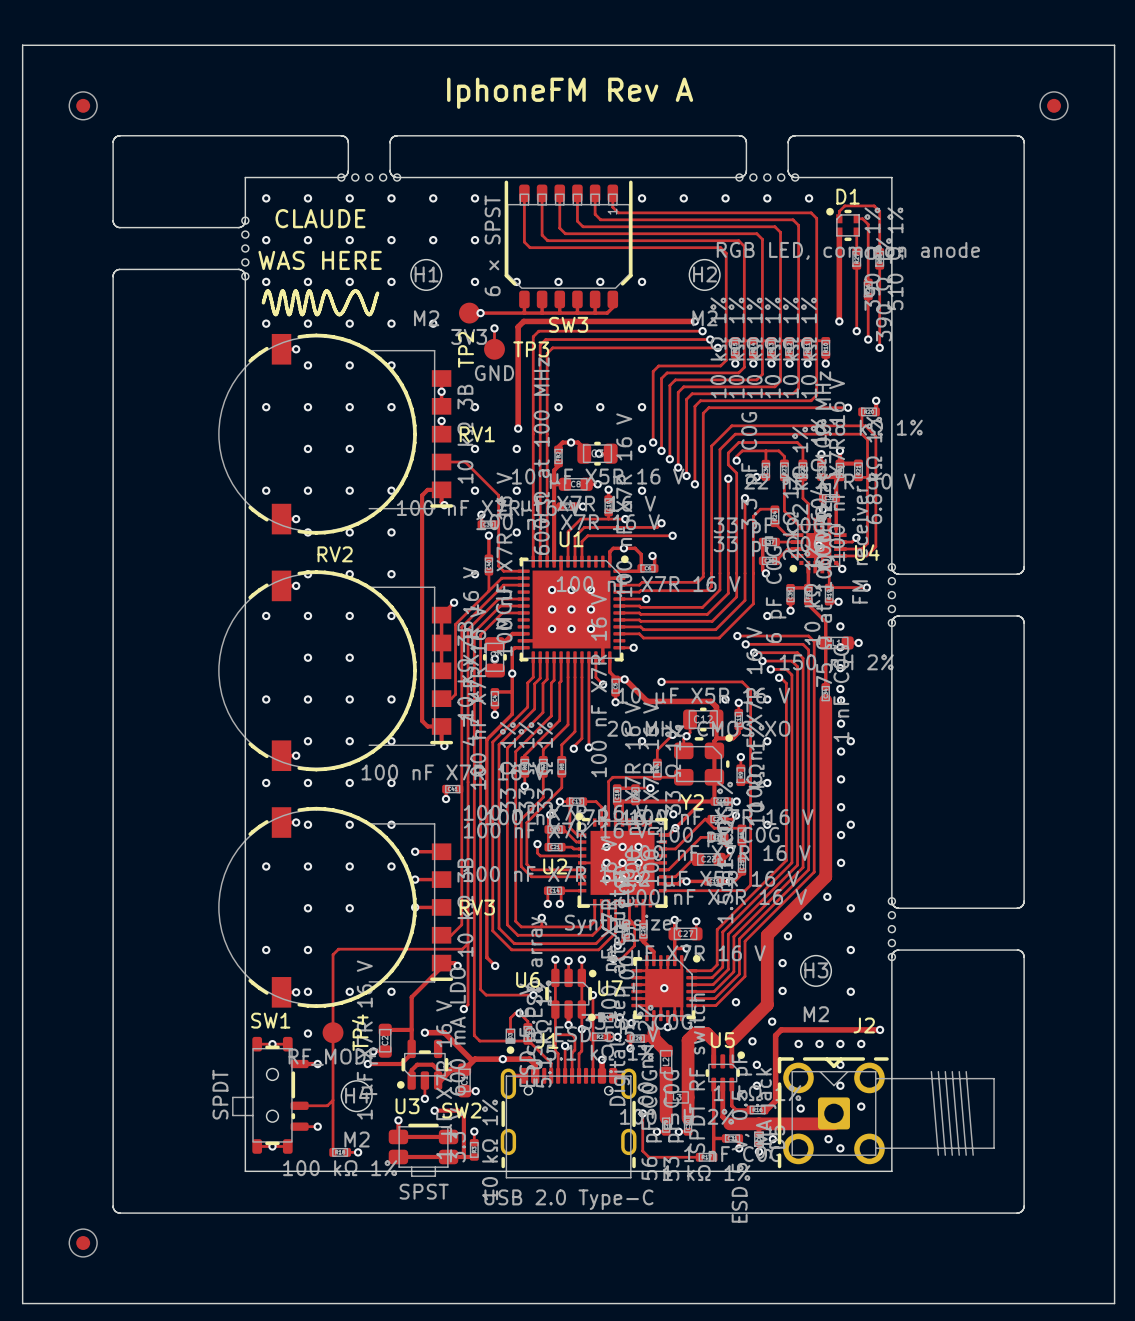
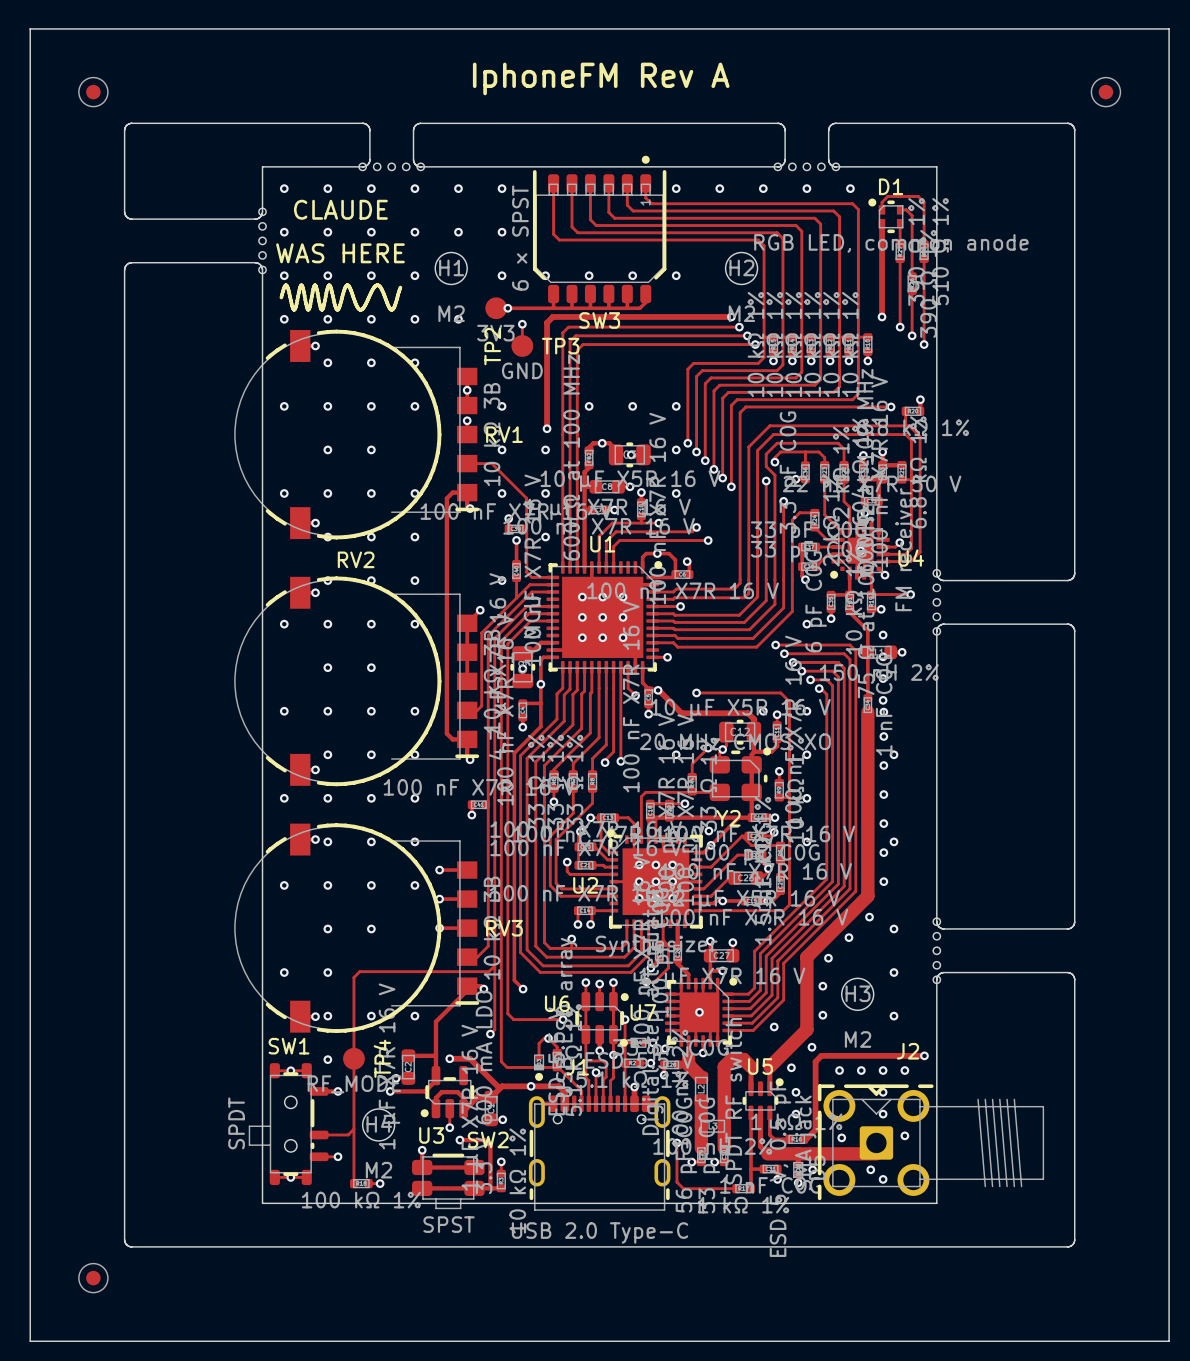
SW3 footprint: [504, 180, 633, 309] -> [532, 155, 667, 304]

